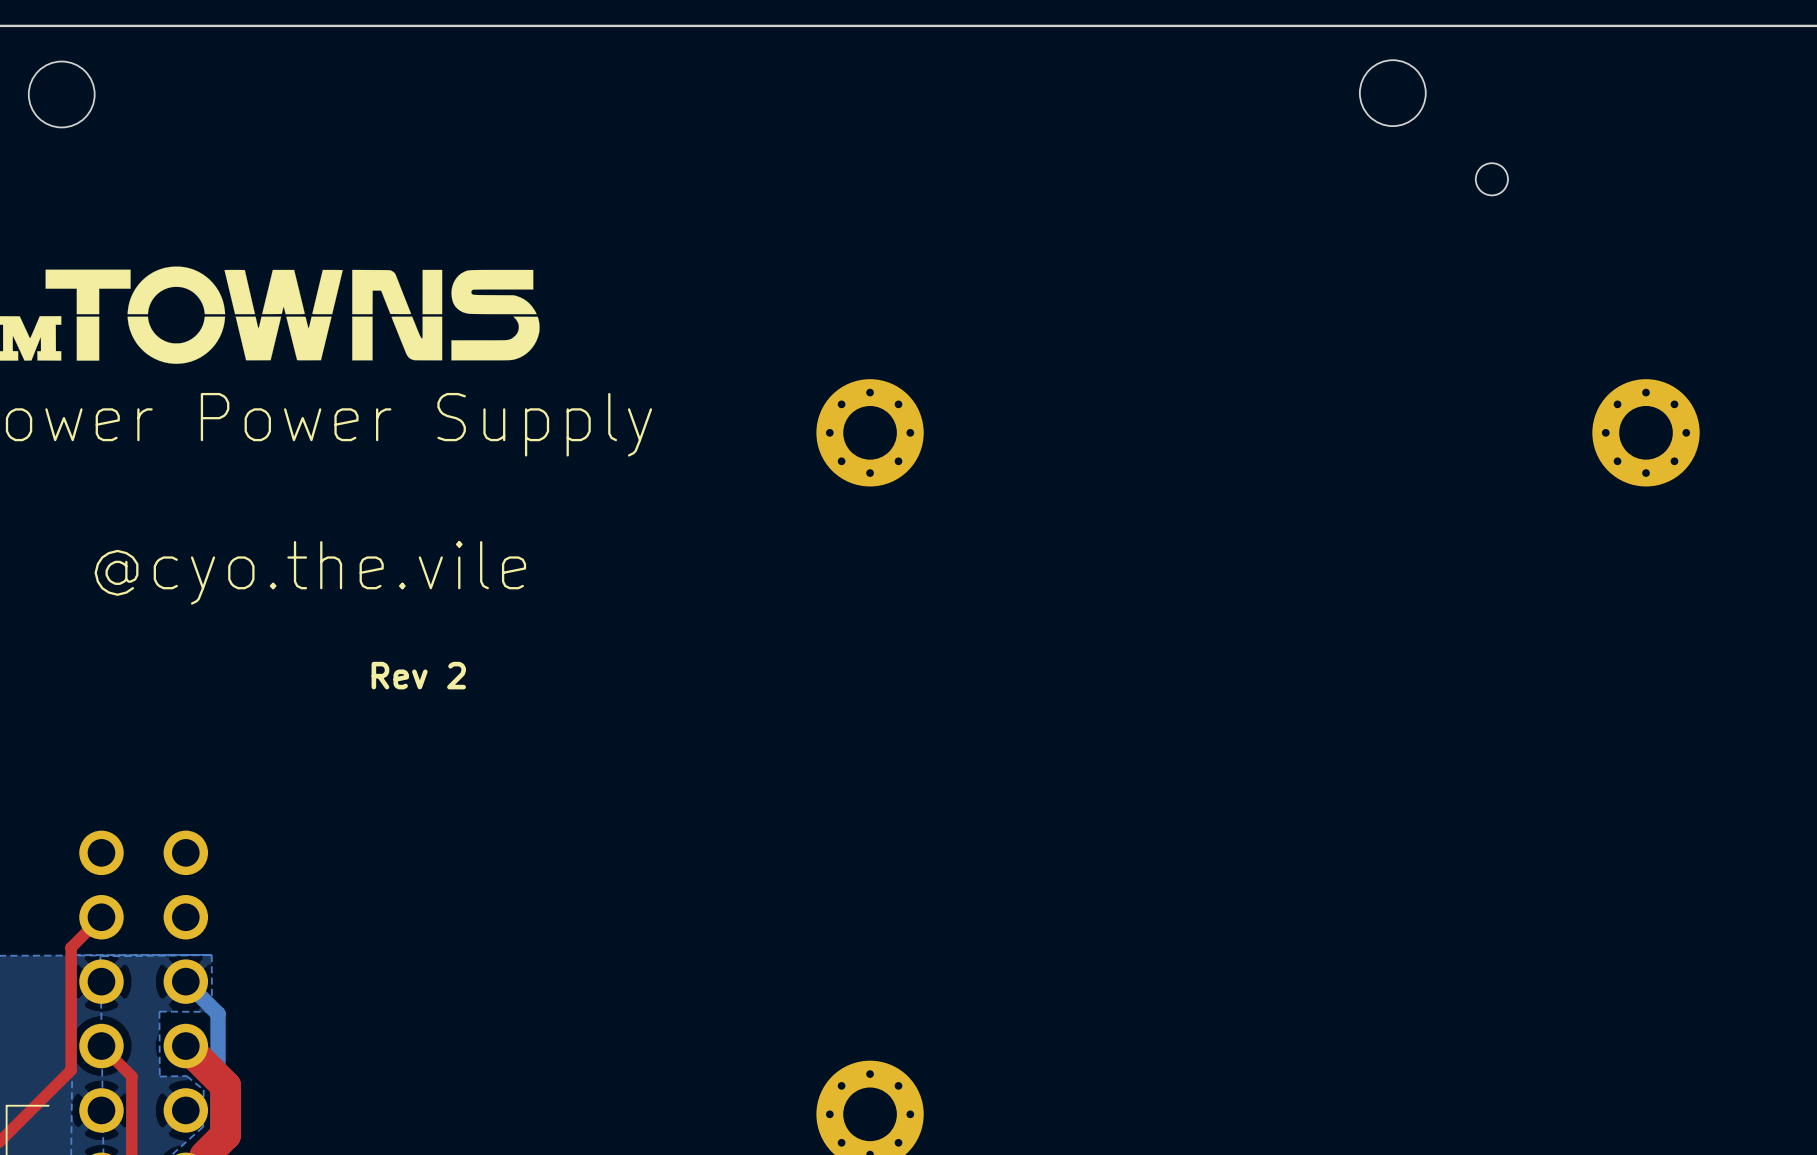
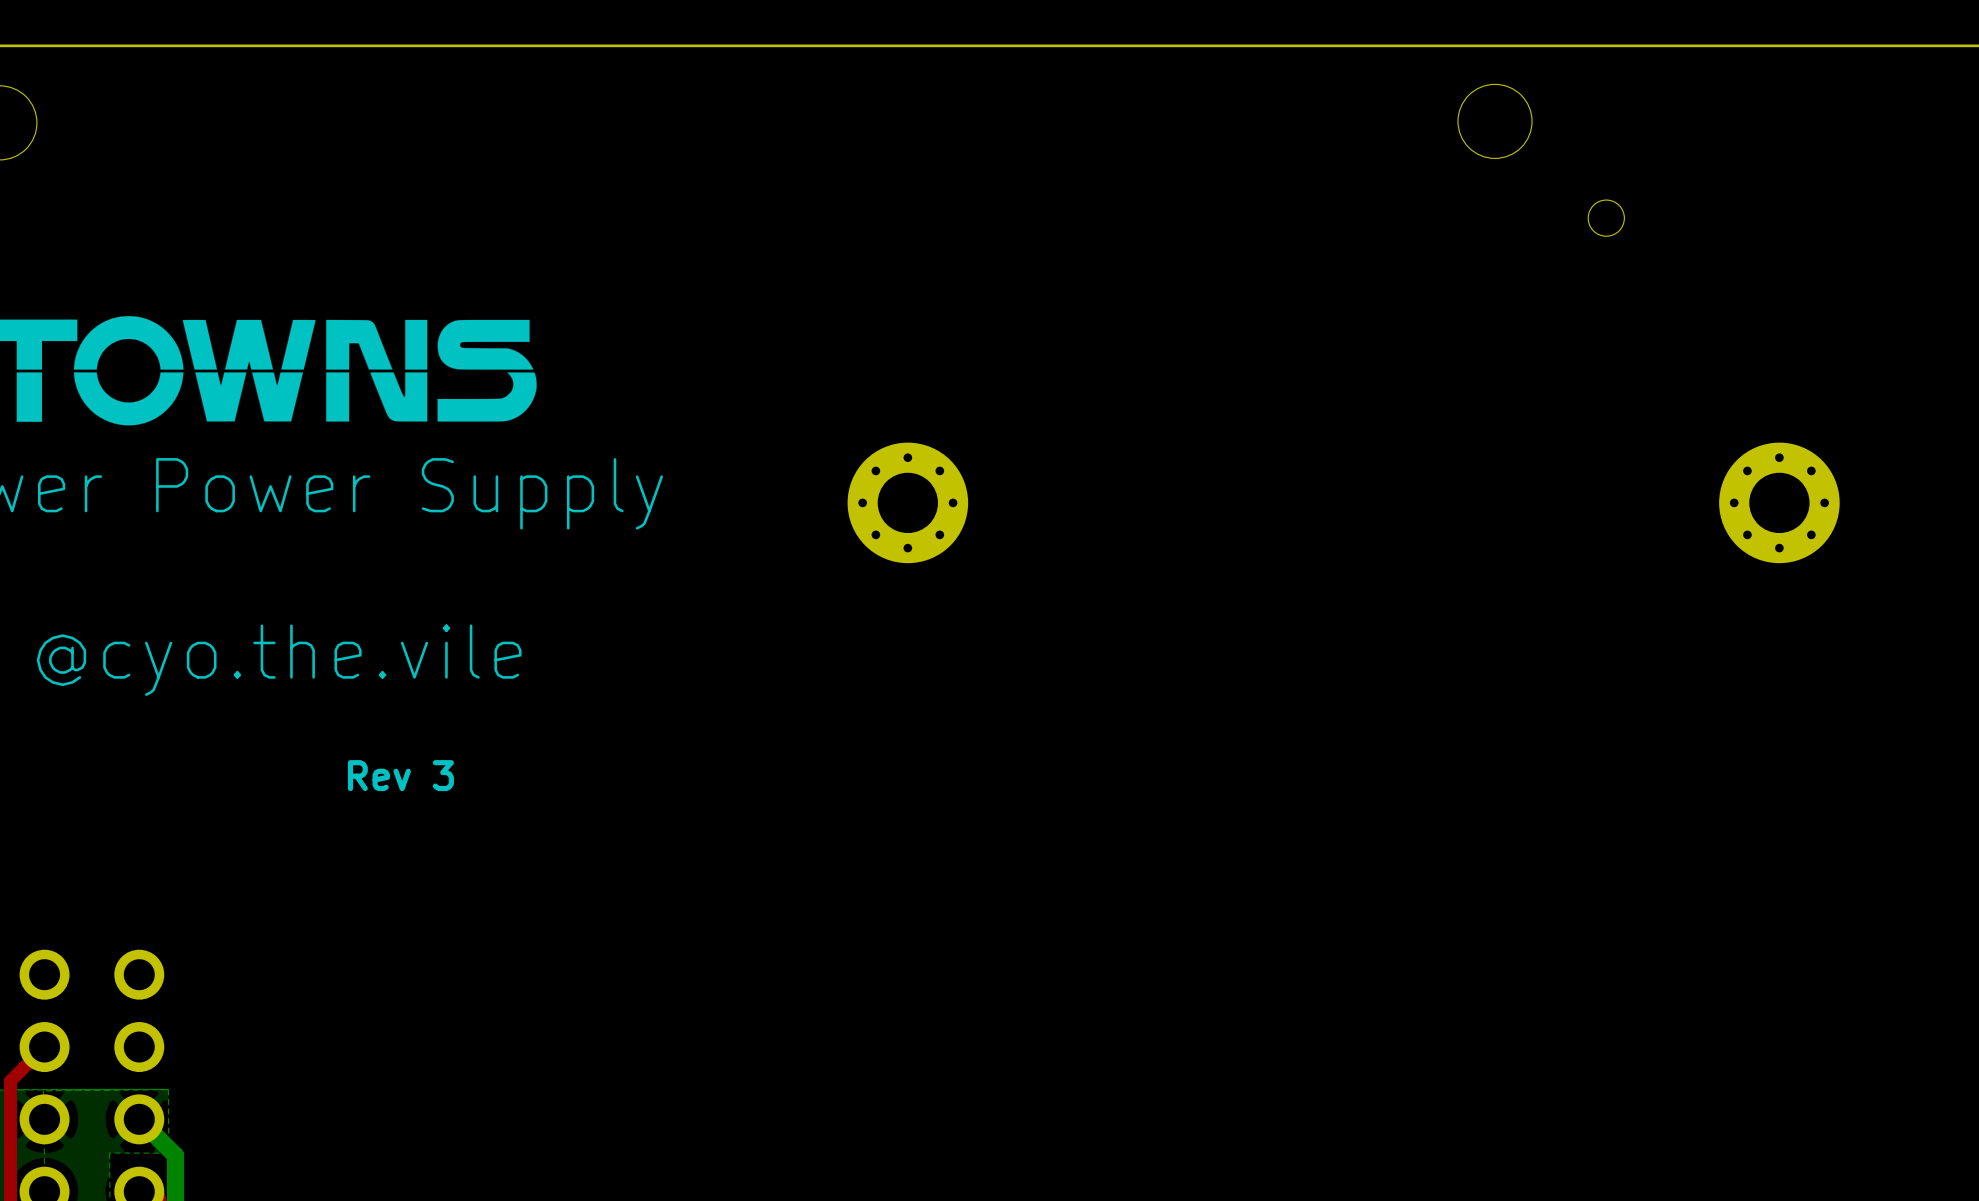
text: Rev 2 (418, 675) -> Rev 3 (400, 775)

